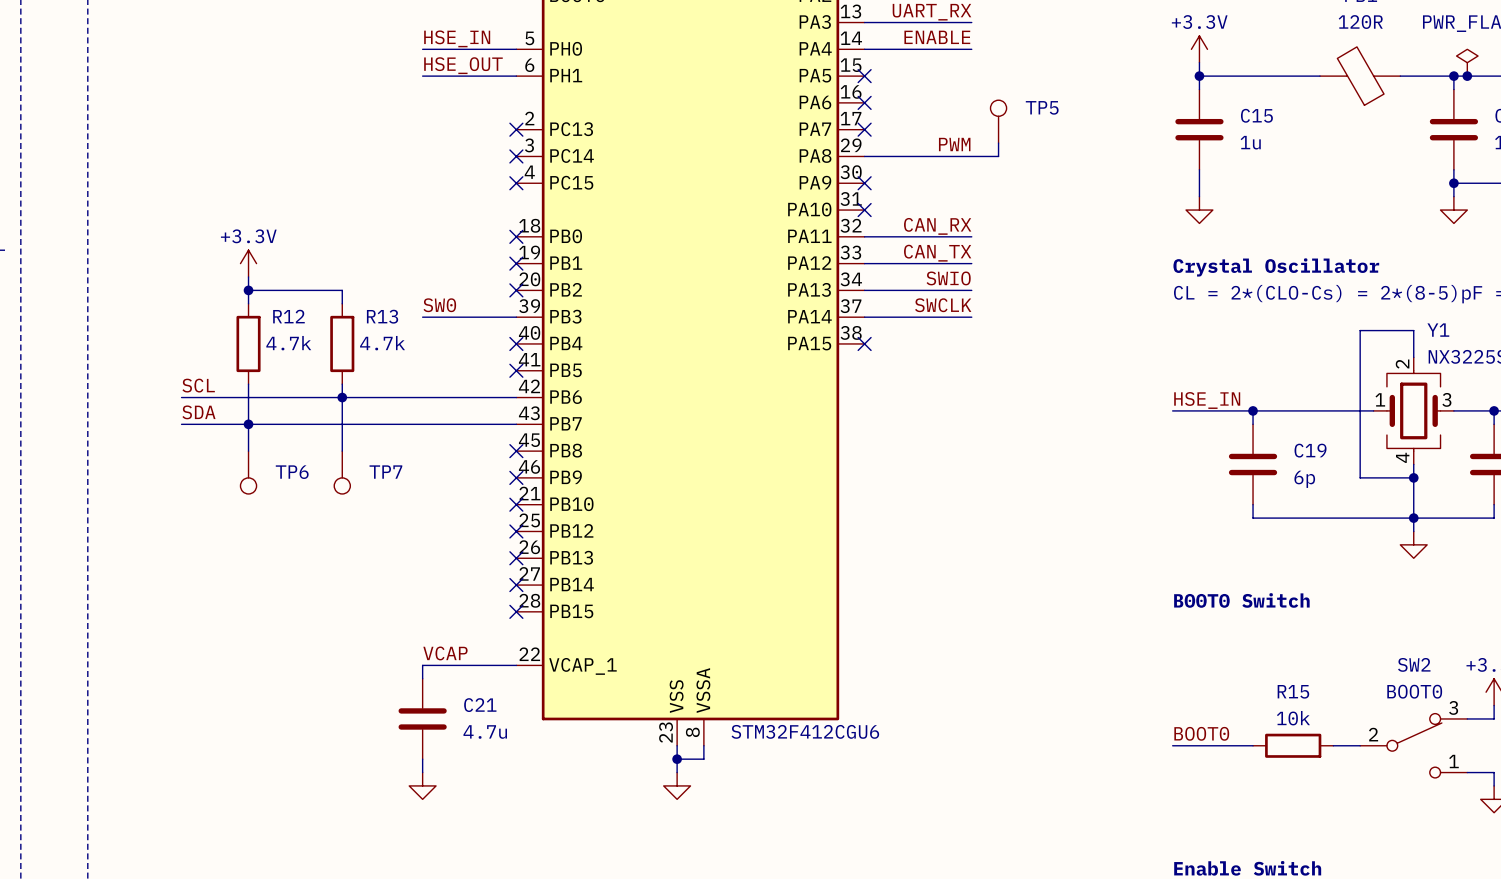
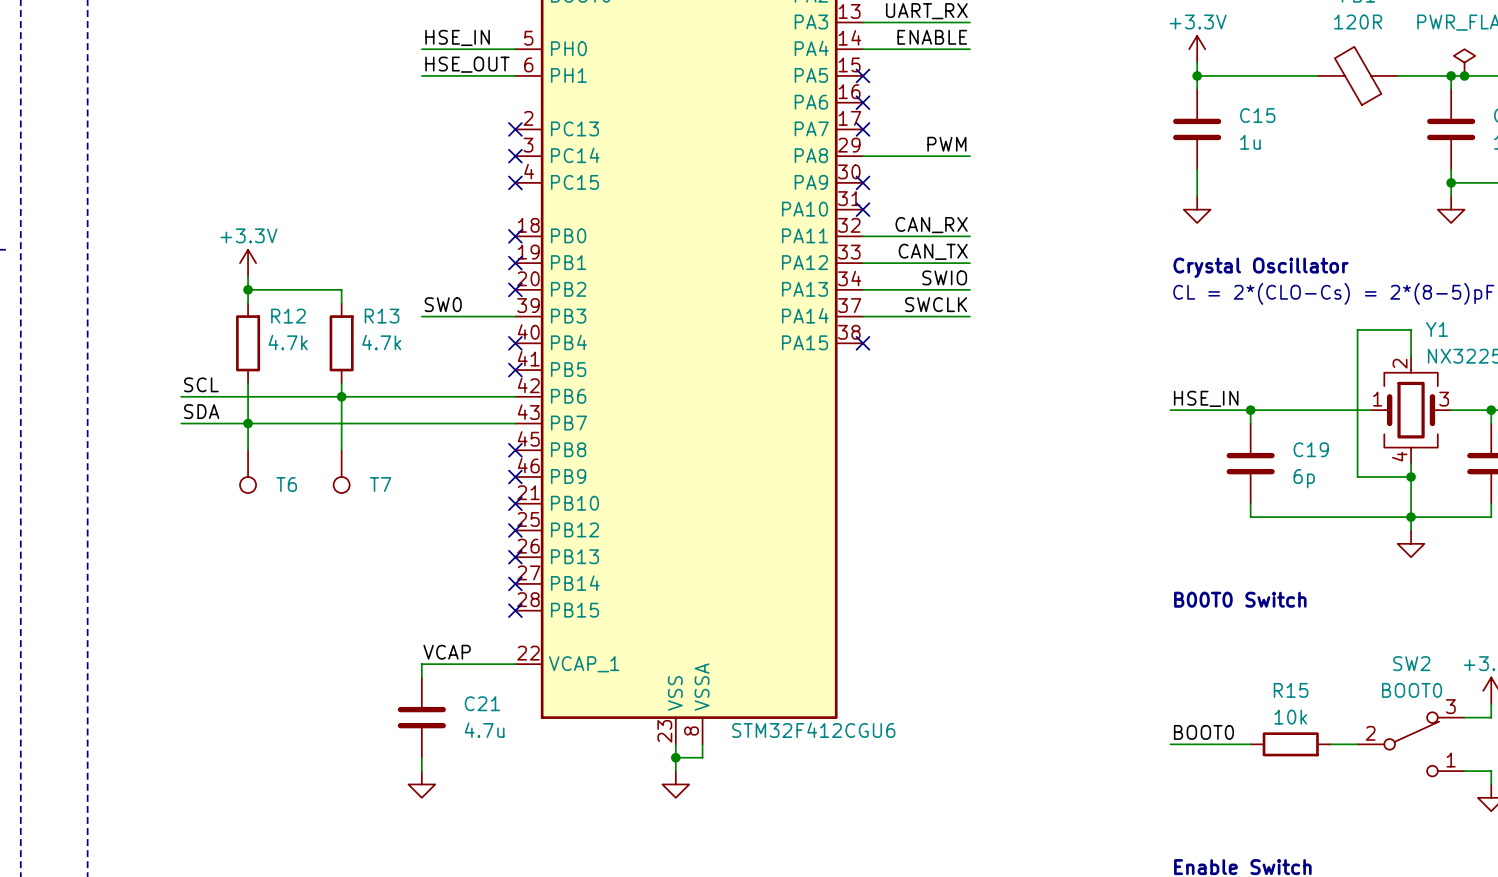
TP5: (998, 121) -> none
wire: (998, 143) (998, 156) (971, 156) -> none
TP6 name: TP6 (292, 472) -> T6 (286, 484)
TP7 name: TP7 (385, 472) -> T7 (380, 484)

